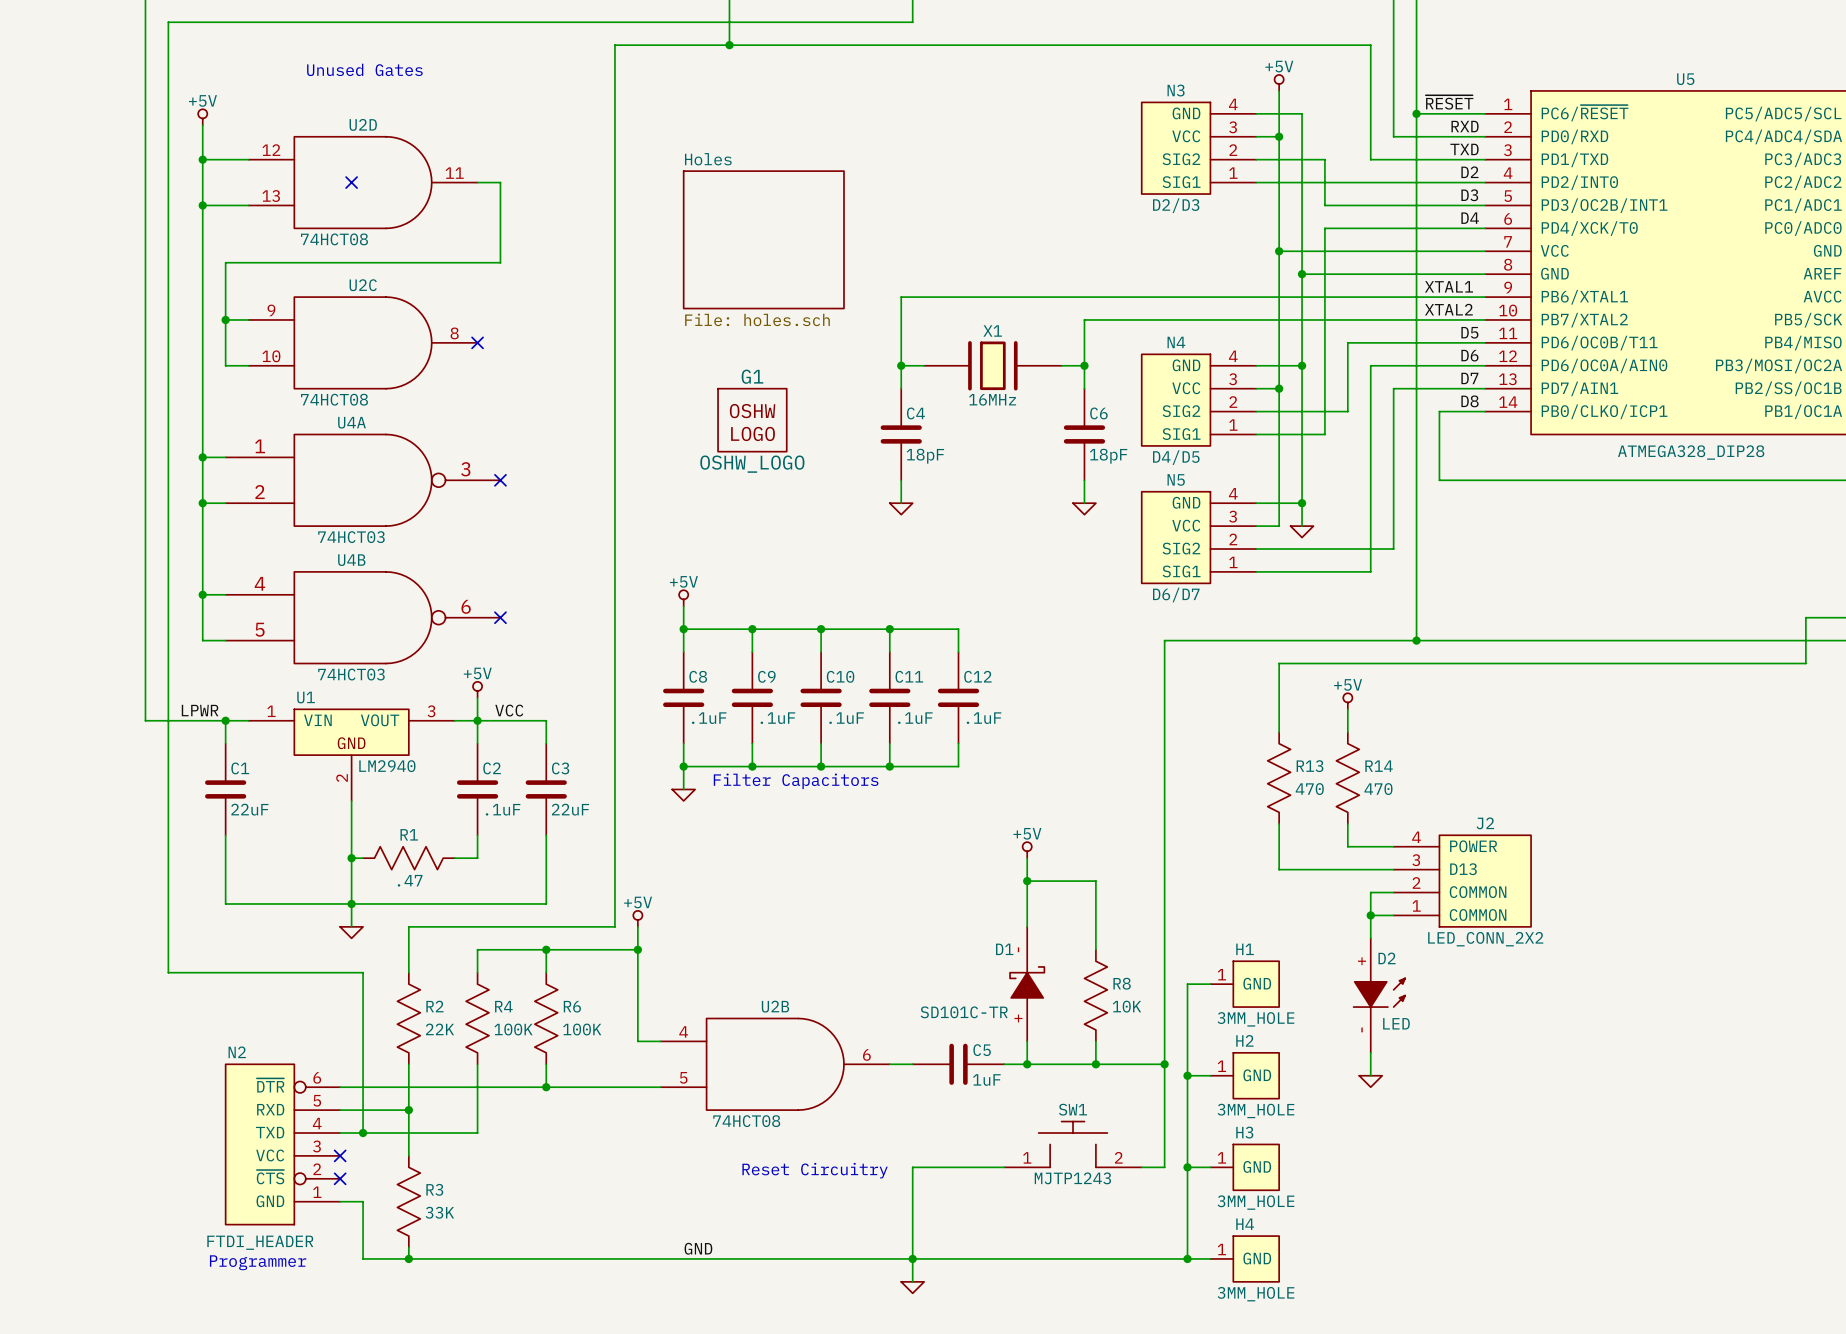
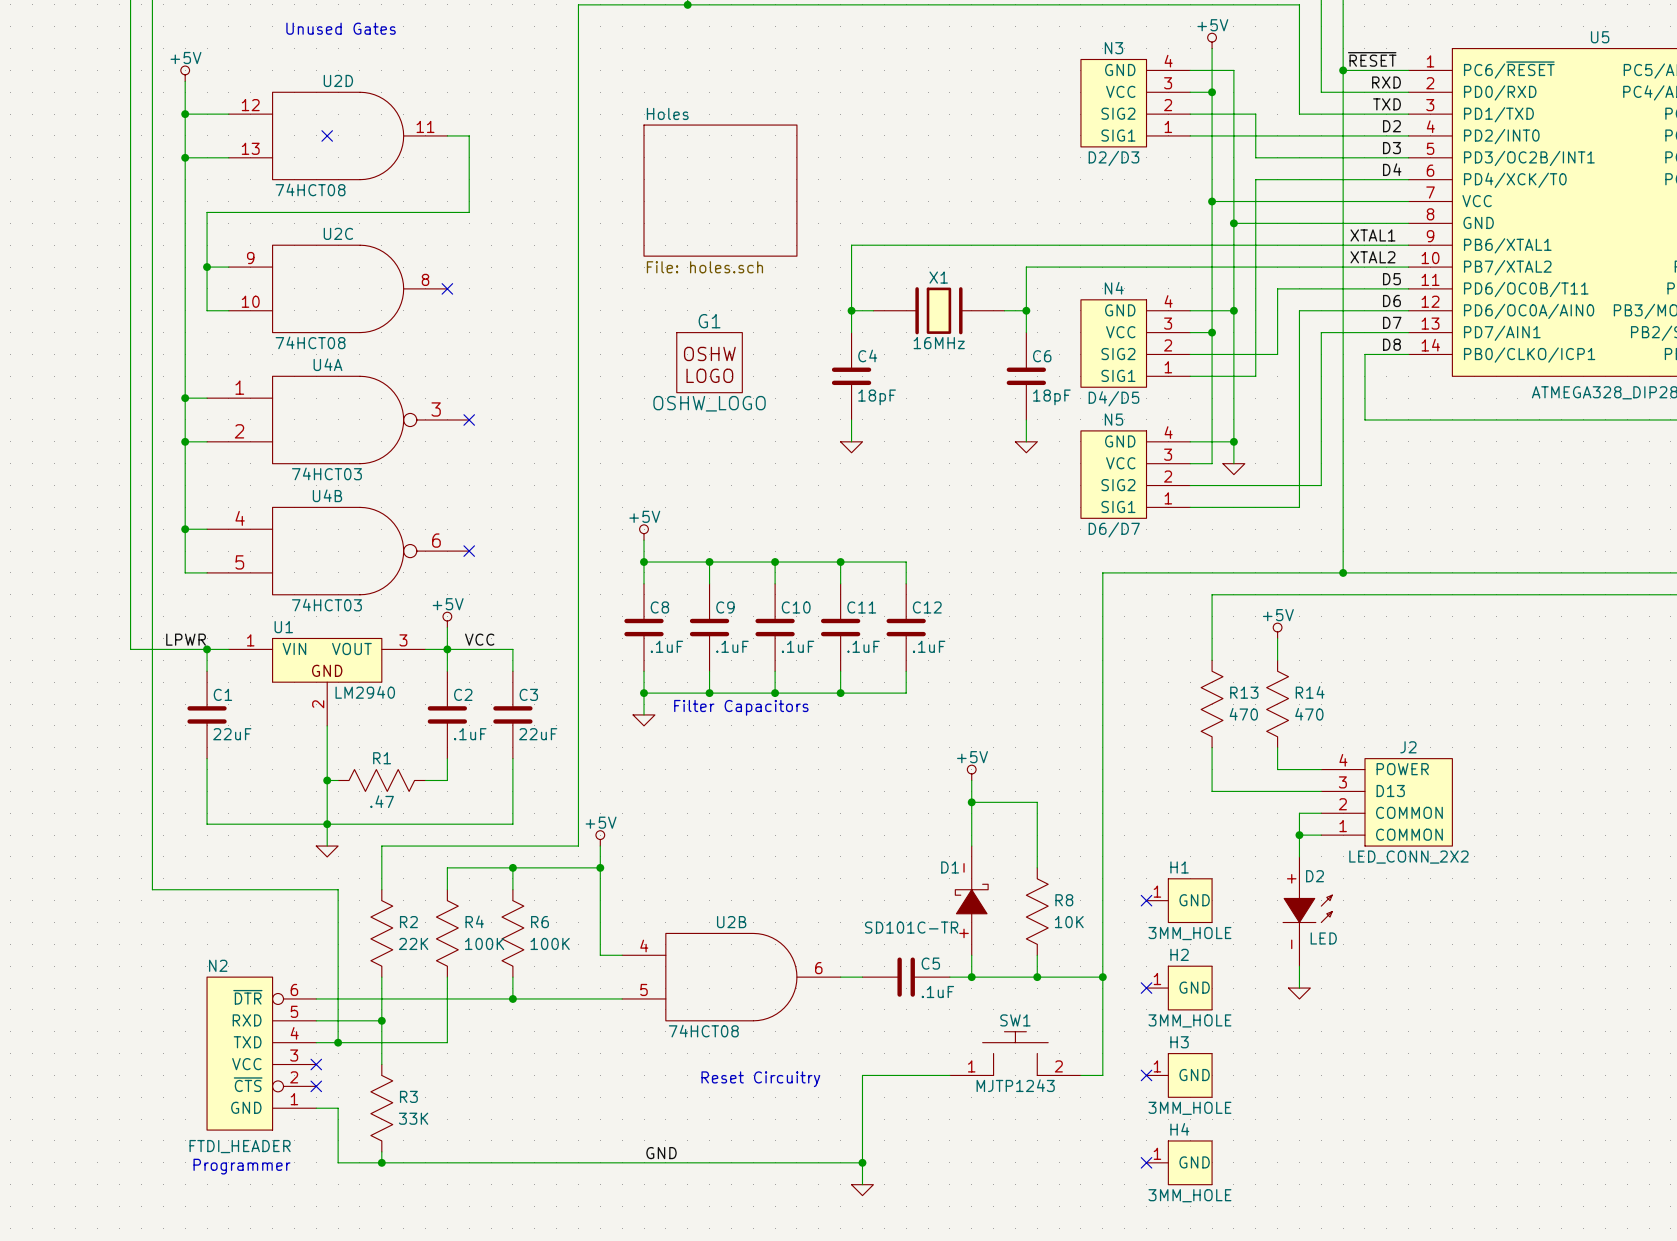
wire: (1210, 984) (1187, 984) (1187, 1258) -> none
no-connect mark: none -> (1146, 900)
wire: (1187, 1075) (1210, 1075) -> none
junction: (1187, 1075) -> none
no-connect mark: none -> (1146, 988)
C5 value: 1uF (986, 1080) -> .1uF (937, 992)
wire: (1187, 1167) (1210, 1167) -> none
junction: (1187, 1167) -> none
no-connect mark: none -> (1146, 1075)
wire: (912, 1258) (1210, 1258) -> none
junction: (1187, 1258) -> none
no-connect mark: none -> (1146, 1162)

